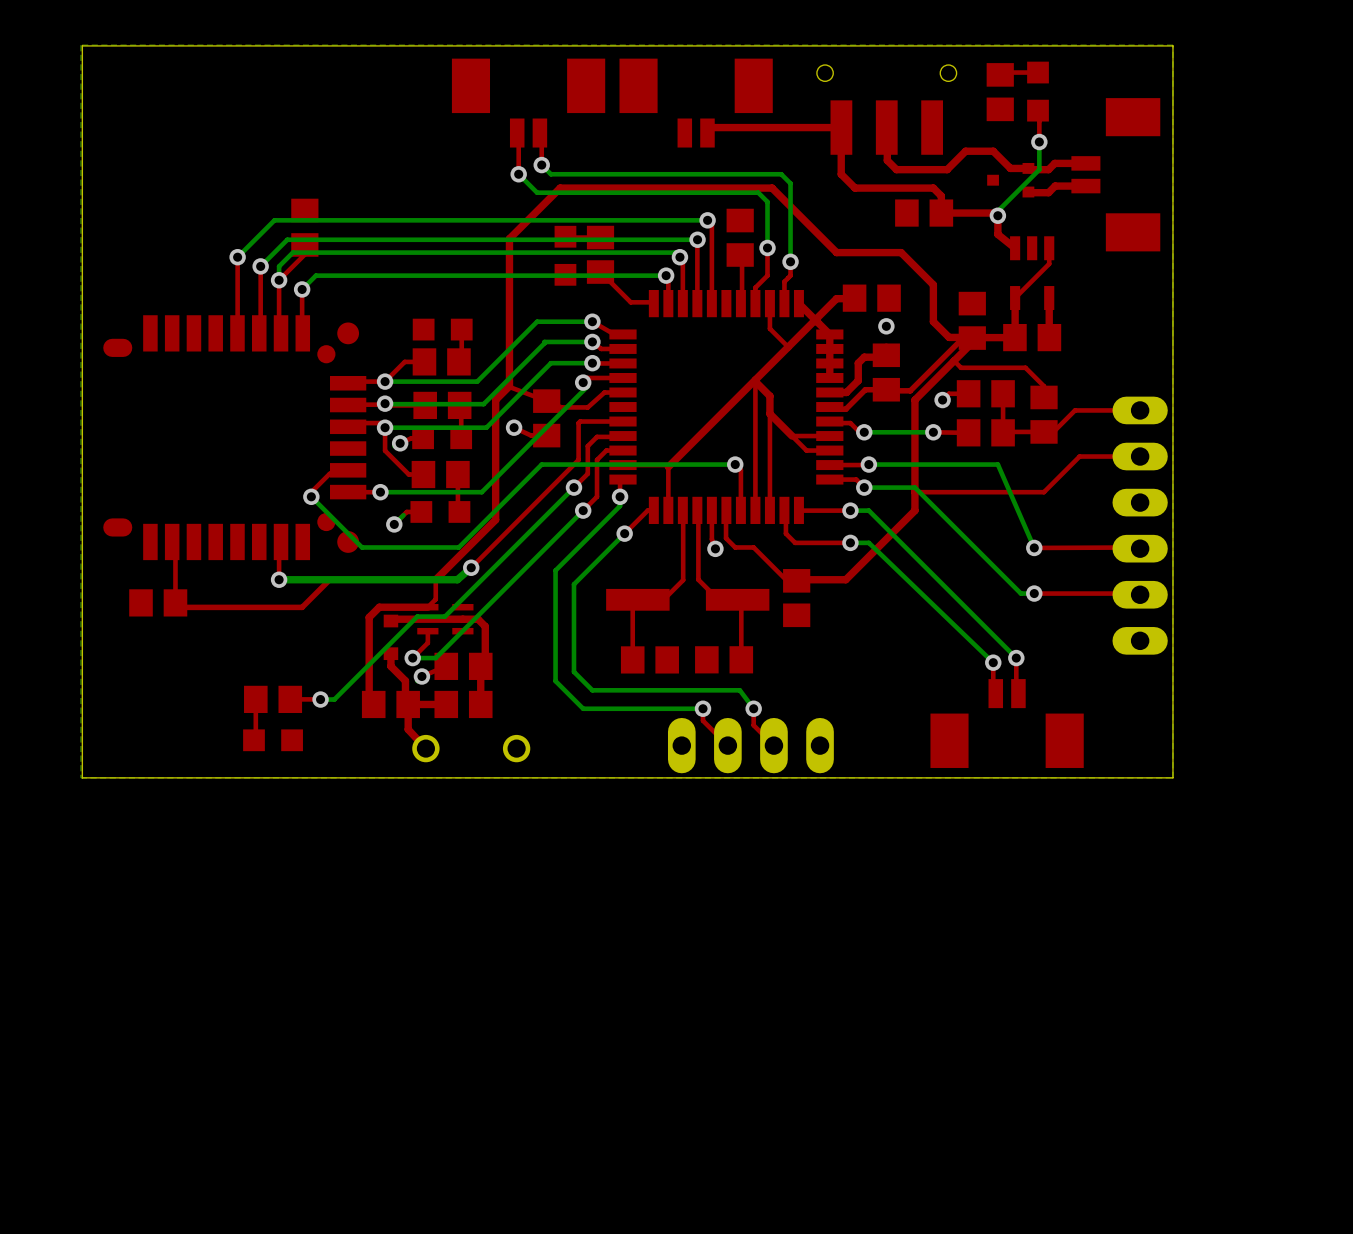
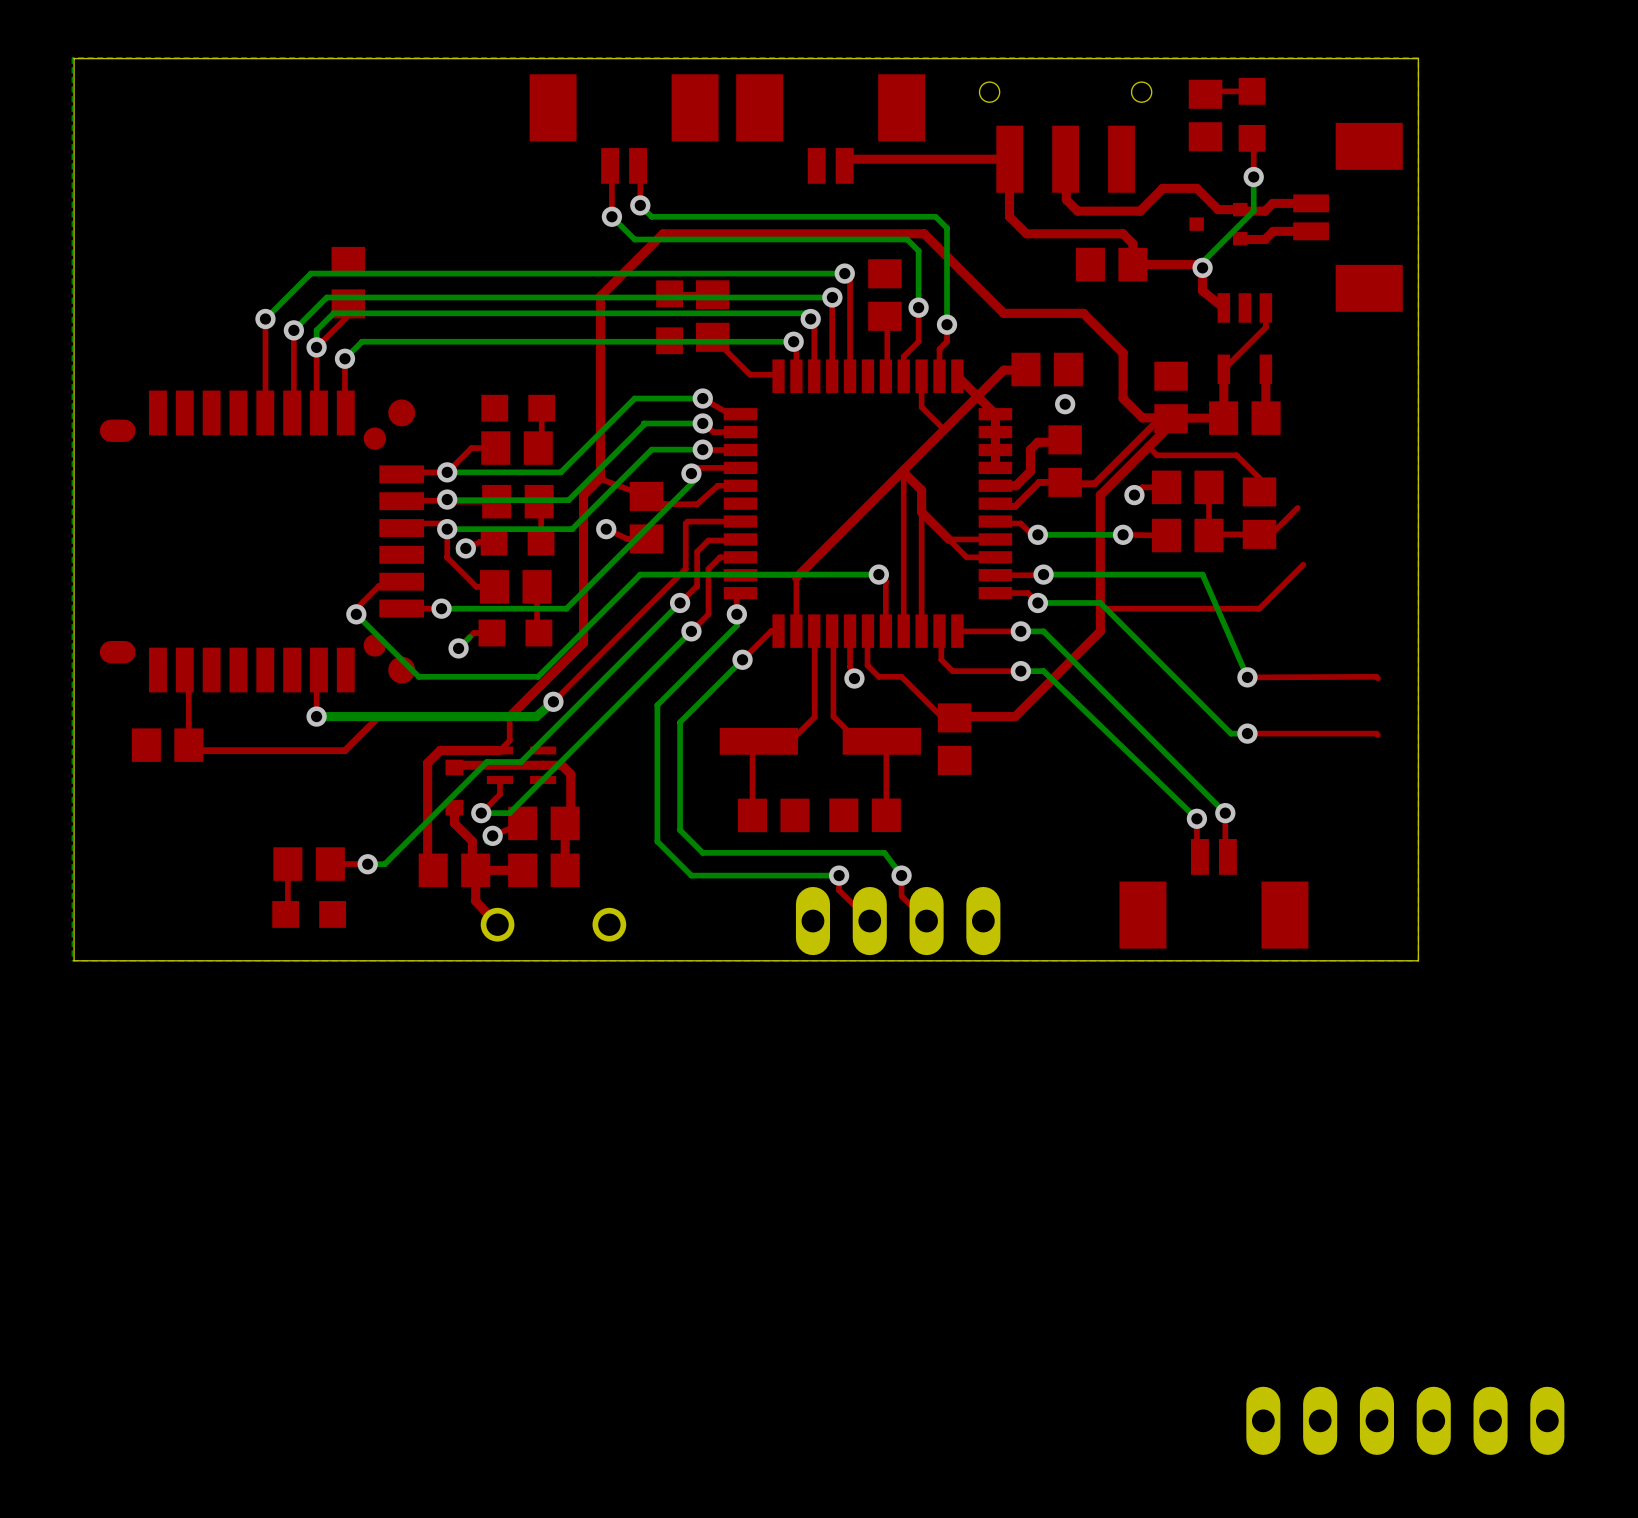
top track: (1140, 410) (1075, 410) -> none
top track: (1140, 456) (1079, 456) -> none
part: (1140, 525) -> none
part: none -> (1405, 1420)

